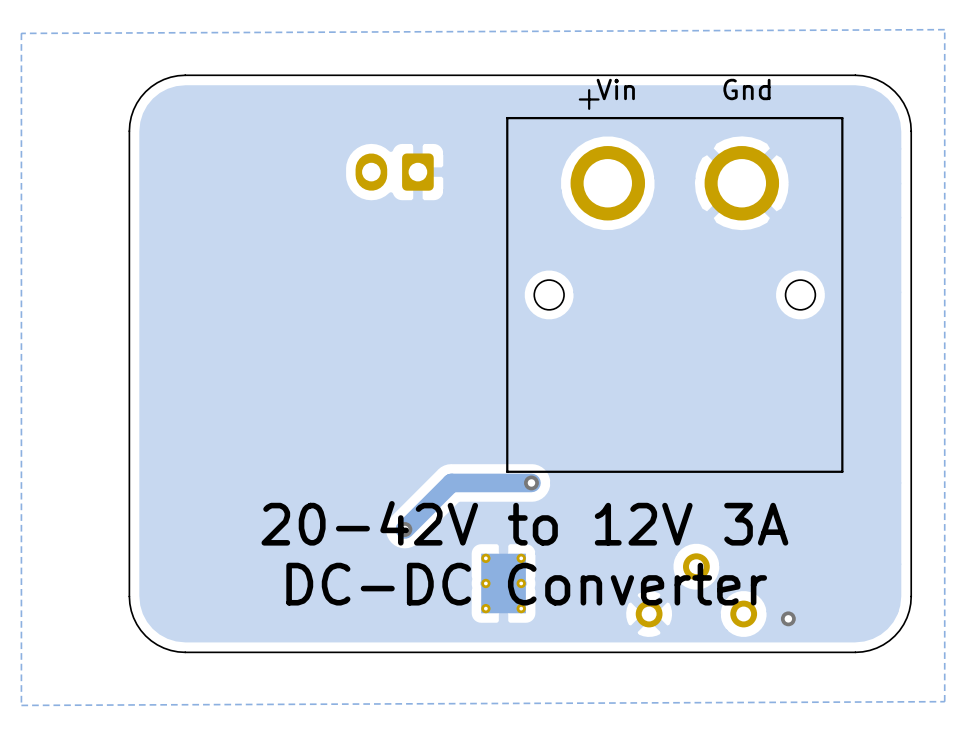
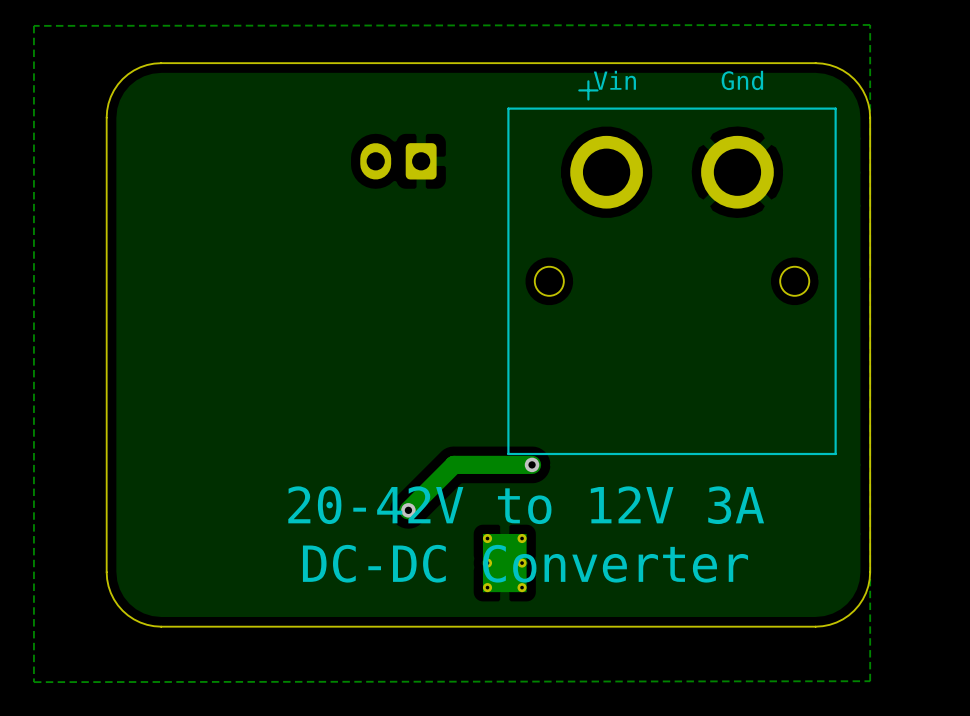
zone outline: (21, 33) (944, 29) (944, 701) (21, 705) -> (33, 25) (870, 24) (870, 681) (33, 682)
board edge: (855, 75) (185, 75) (170, 77) (151, 86) (140, 97) (133, 109) (129, 131) (129, 596) (133, 617) (140, 630) (151, 640) (163, 648) (185, 652) (855, 652) (869, 650) (889, 640) (899, 630) (906, 617) (911, 596) (911, 131) (906, 109) (894, 91) (876, 79) (855, 75) -> (815, 63) (161, 63) (147, 65) (128, 74) (117, 84) (110, 96) (106, 117) (106, 572) (110, 593) (117, 605) (128, 615) (140, 622) (161, 626) (815, 626) (836, 622) (848, 615) (858, 605) (866, 593) (870, 572) (870, 117) (866, 96) (854, 79) (836, 67) (815, 63)
part: (696, 590) -> none
via: (788, 618) -> none

